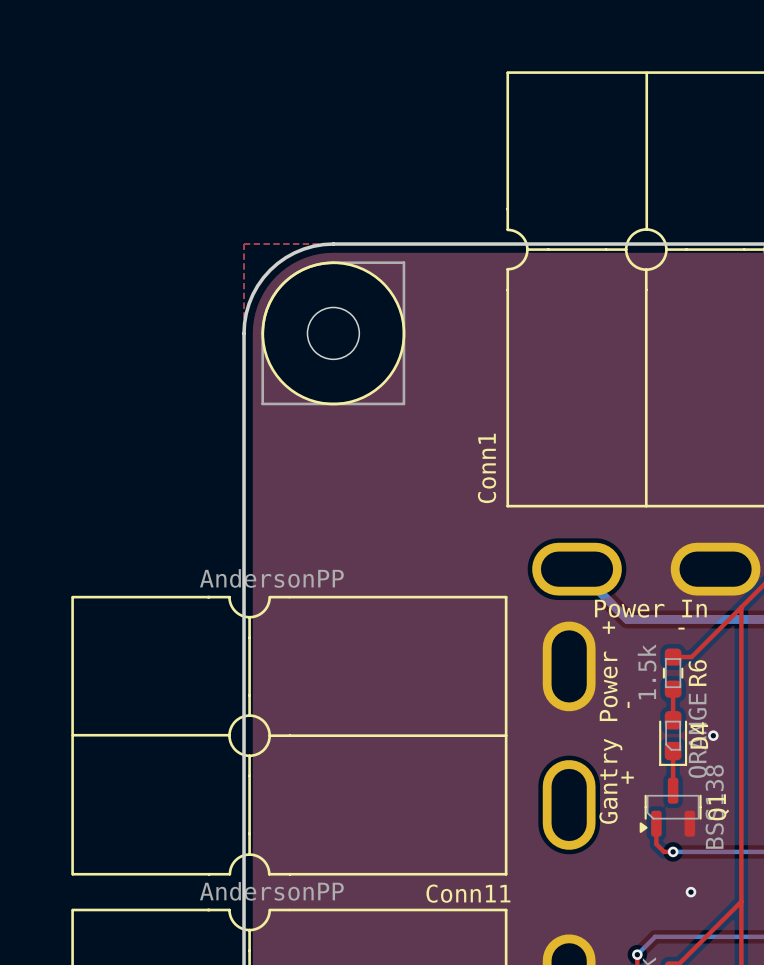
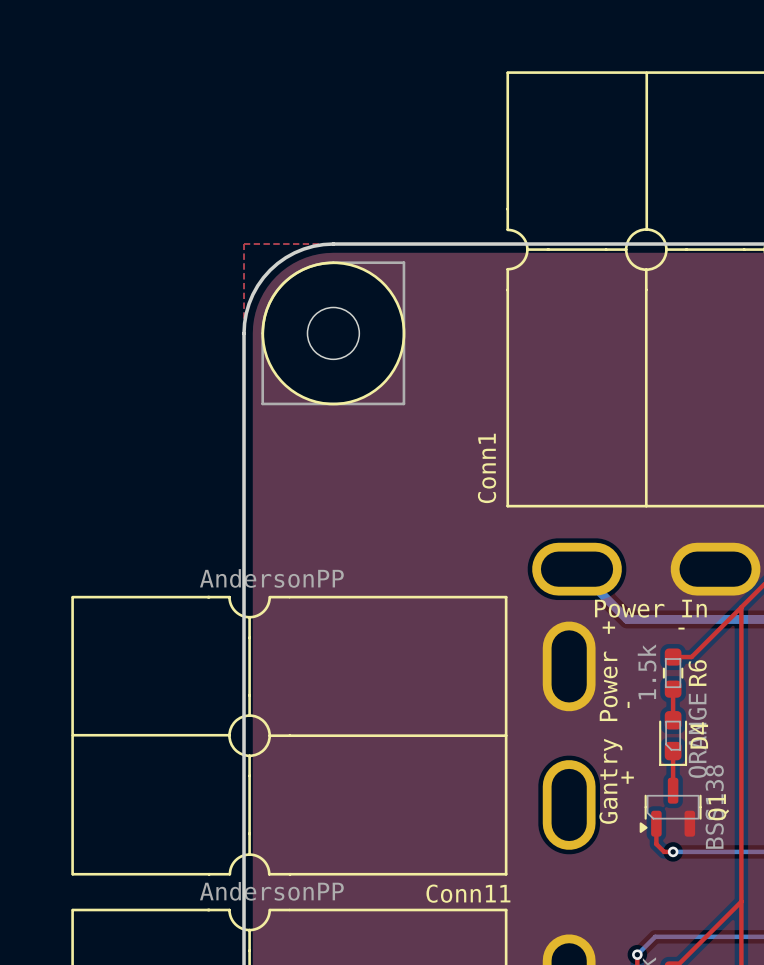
via: (713, 735) -> none
via: (690, 892) -> none

